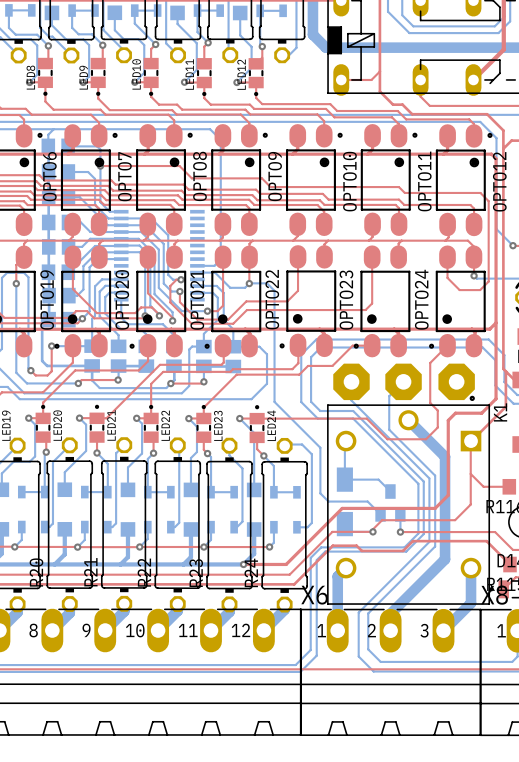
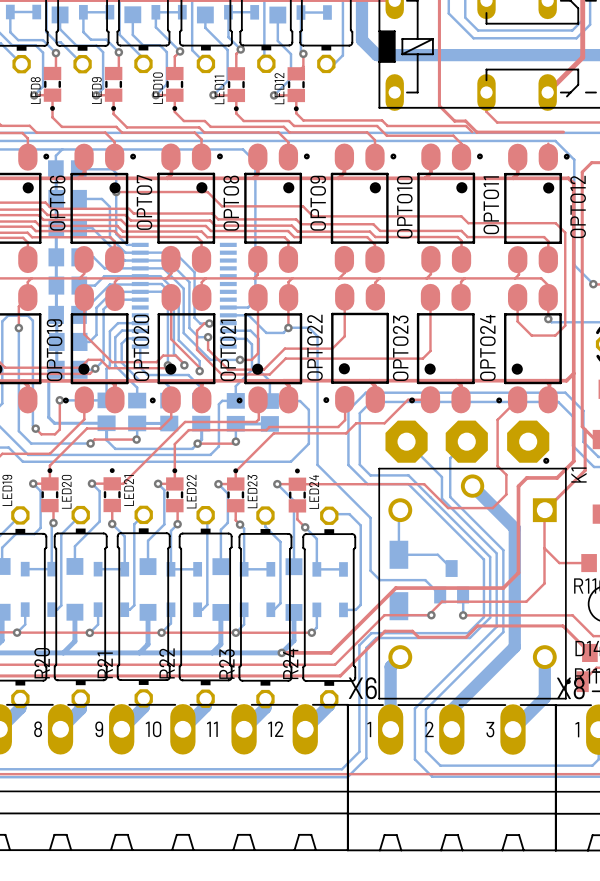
top track: (379, 71) (371, 79) (341, 79) -> none
top track: (335, 108) (337, 111) (397, 111) (406, 119) (469, 119) (474, 124) -> (387, 125) (466, 125) (472, 132)
top track: (487, 114) (503, 130) (503, 148) -> none
bottom track: (351, 381) (351, 400) (382, 431) -> (406, 441) (441, 477) (441, 498)

